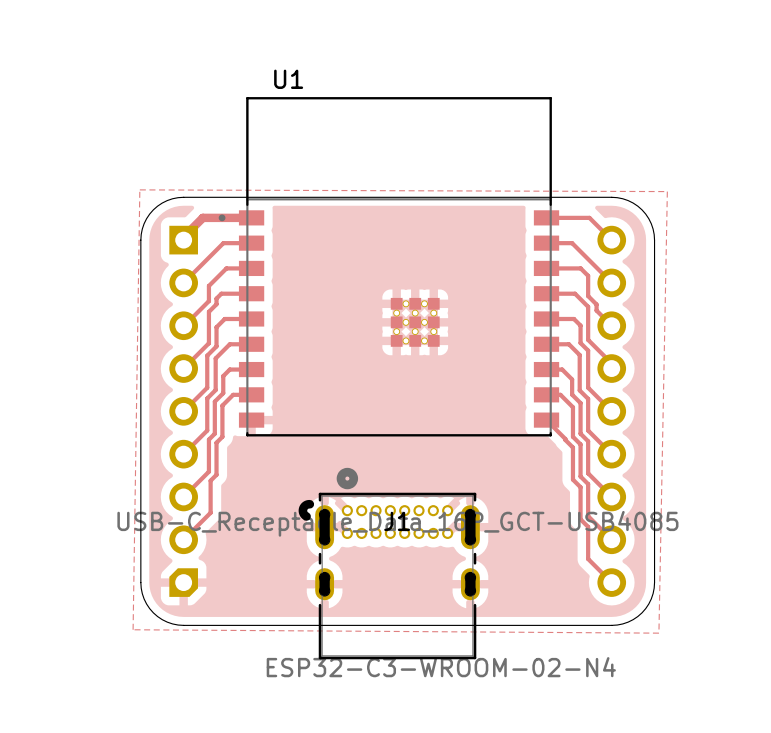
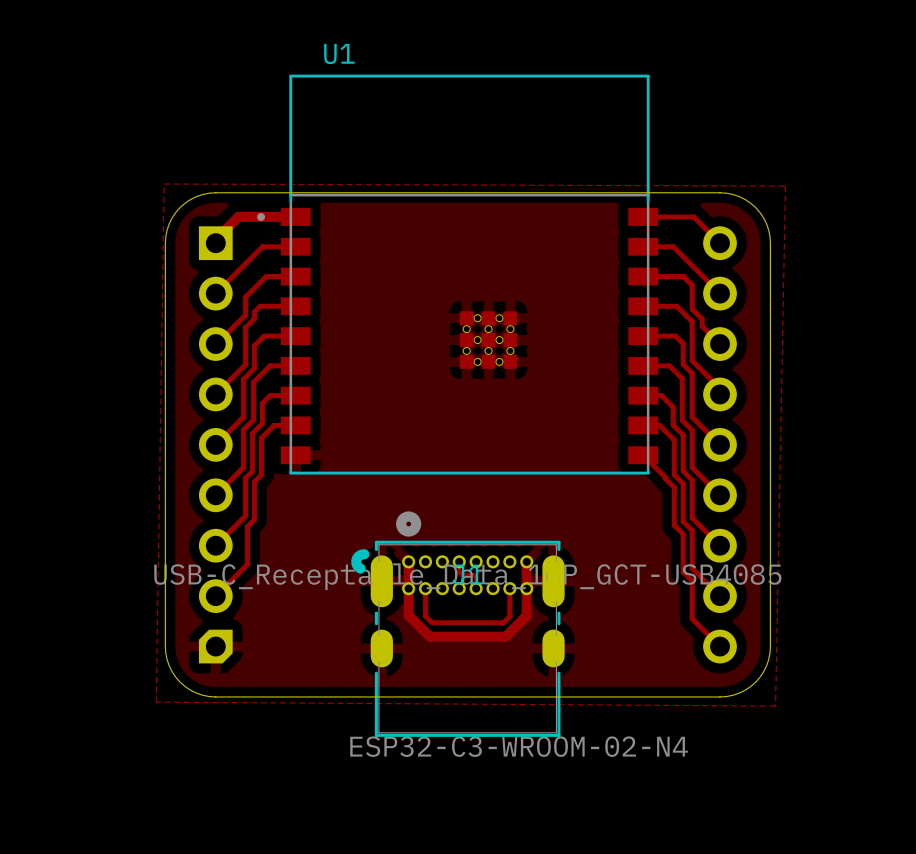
track: none -> (408, 561) (408, 615) (429, 636) (505, 636) (526, 615) (526, 561)
track: none -> (459, 561) (459, 572) (461, 575) (473, 575) (476, 577) (476, 588)
track: none -> (425, 588) (425, 616) (432, 622) (503, 622) (509, 616) (509, 588)

